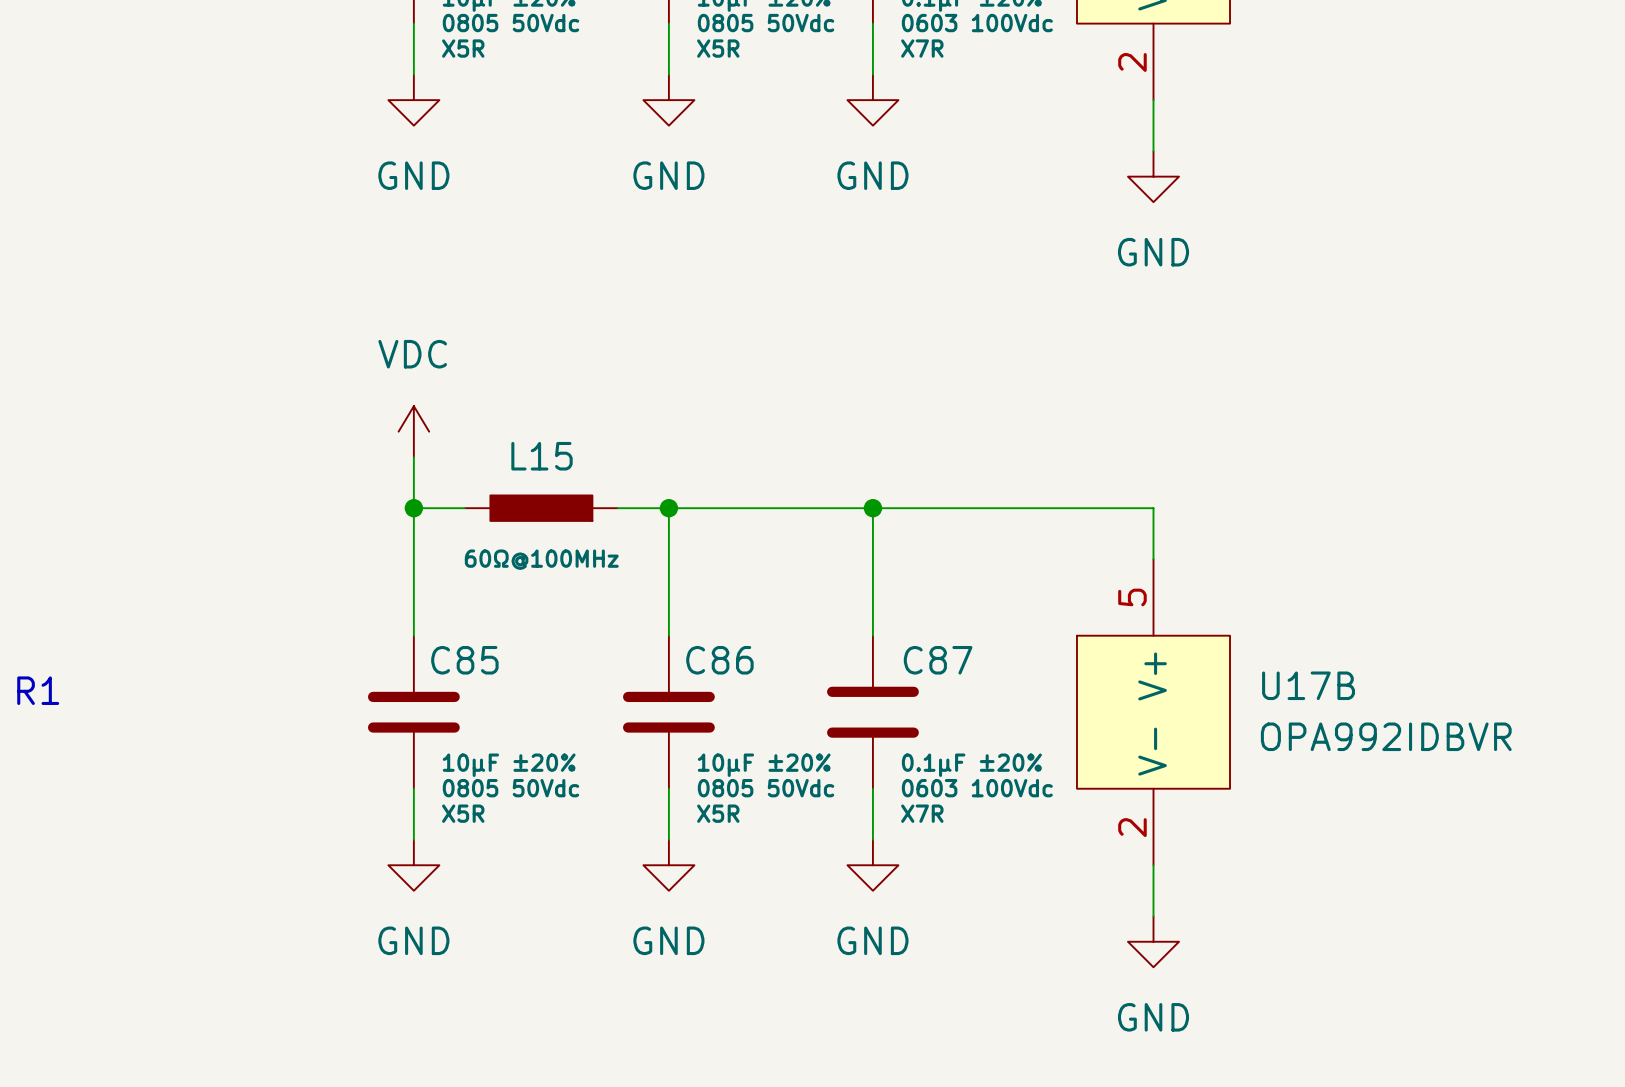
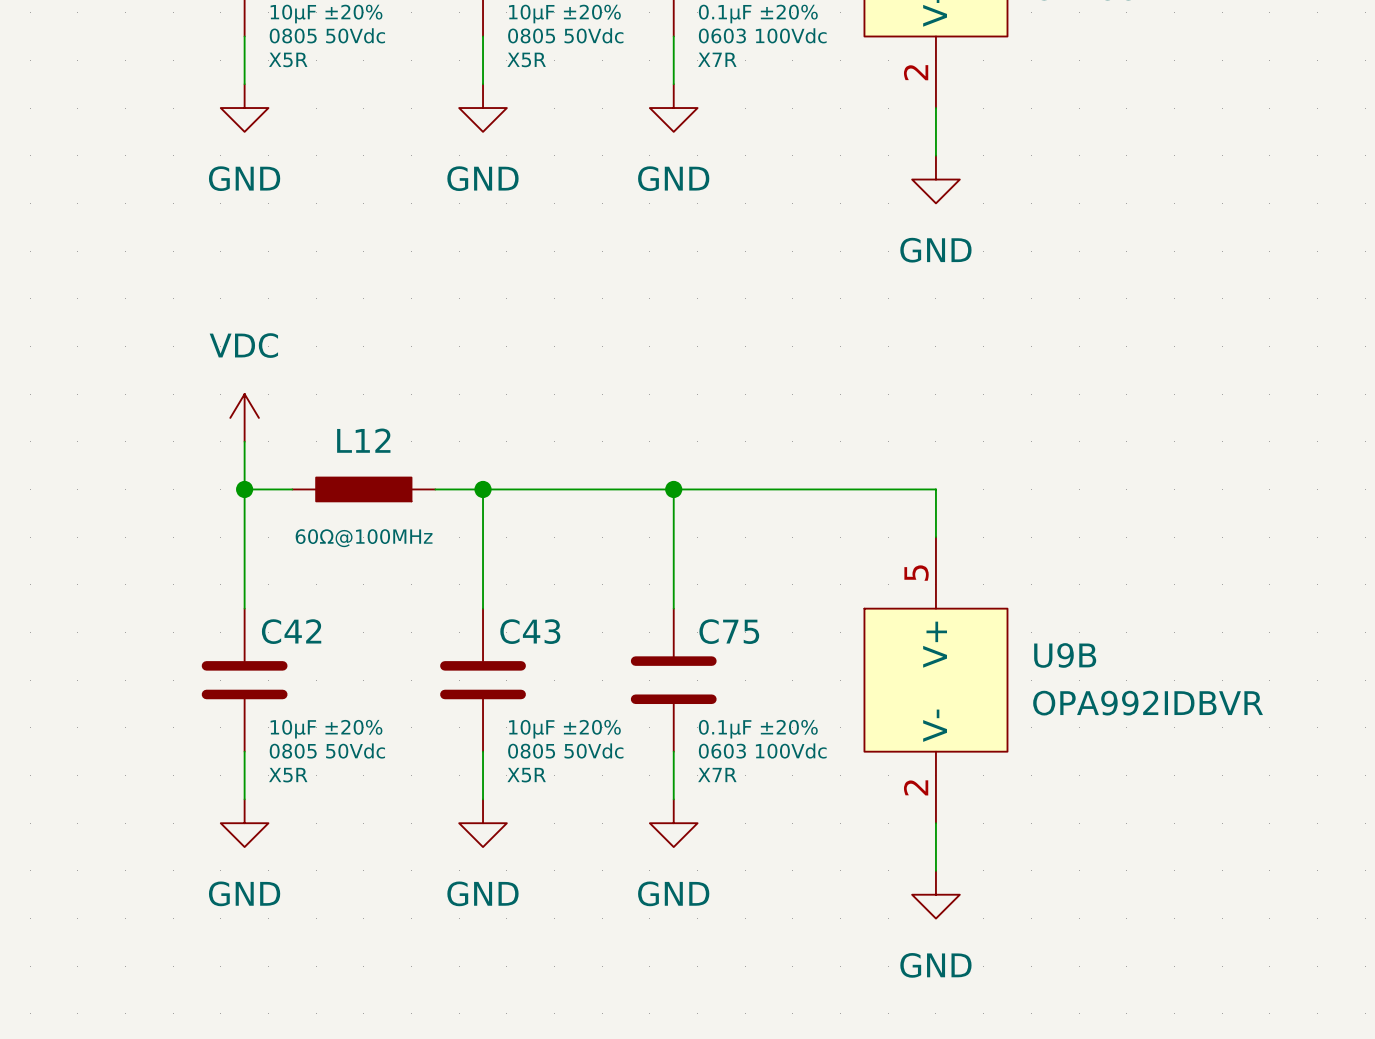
L15 name: L15 (542, 456) -> L12 (363, 440)
C85 name: C85 (464, 660) -> C42 (291, 631)
C86 name: C86 (719, 660) -> C43 (530, 631)
C87 name: C87 (938, 660) -> C75 (729, 631)
U17B name: U17B (1308, 685) -> U9B (1065, 655)

